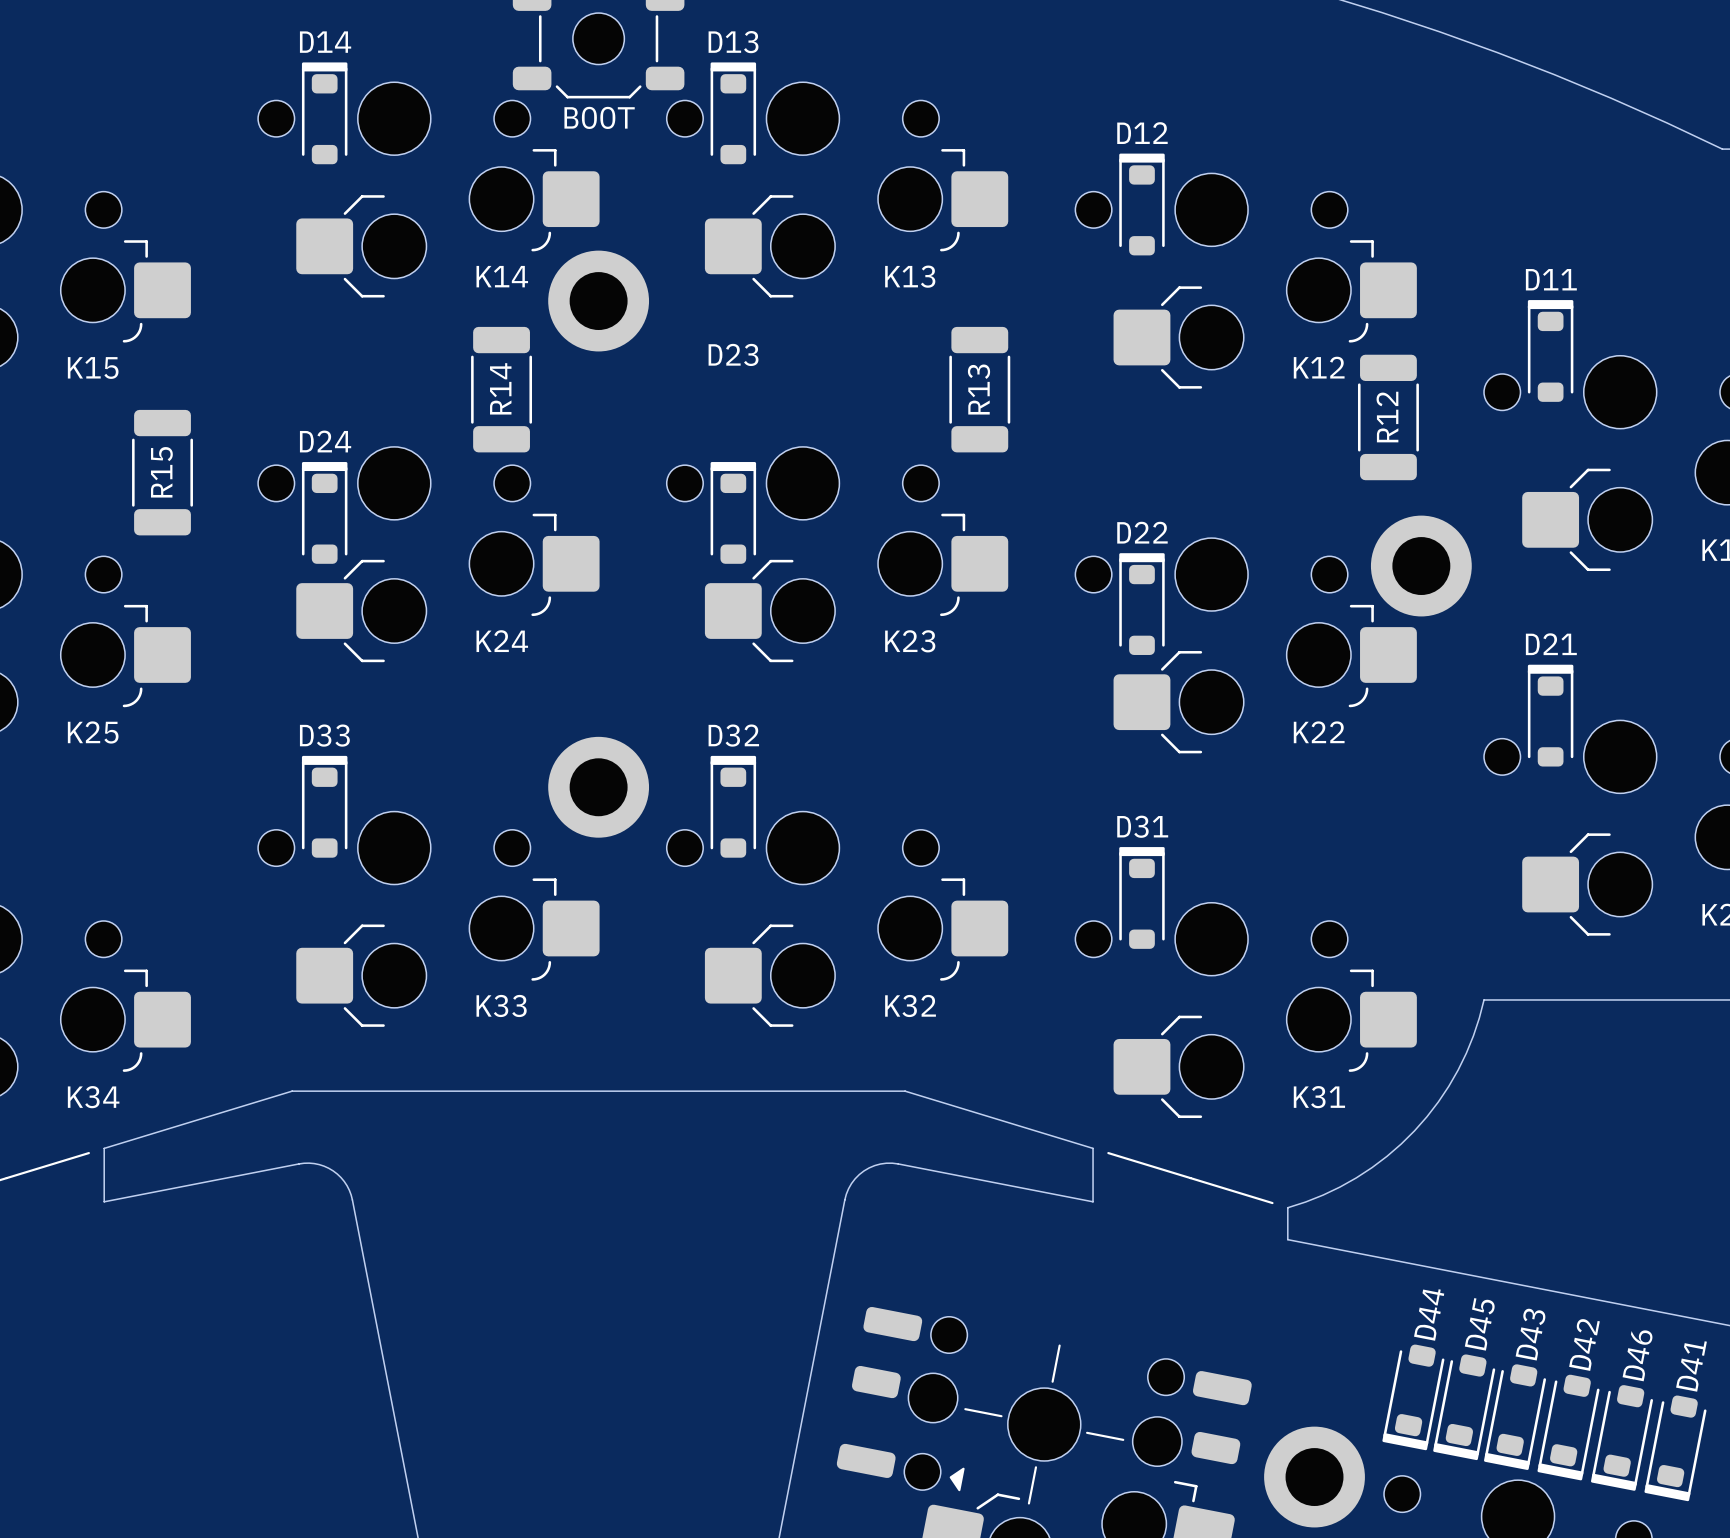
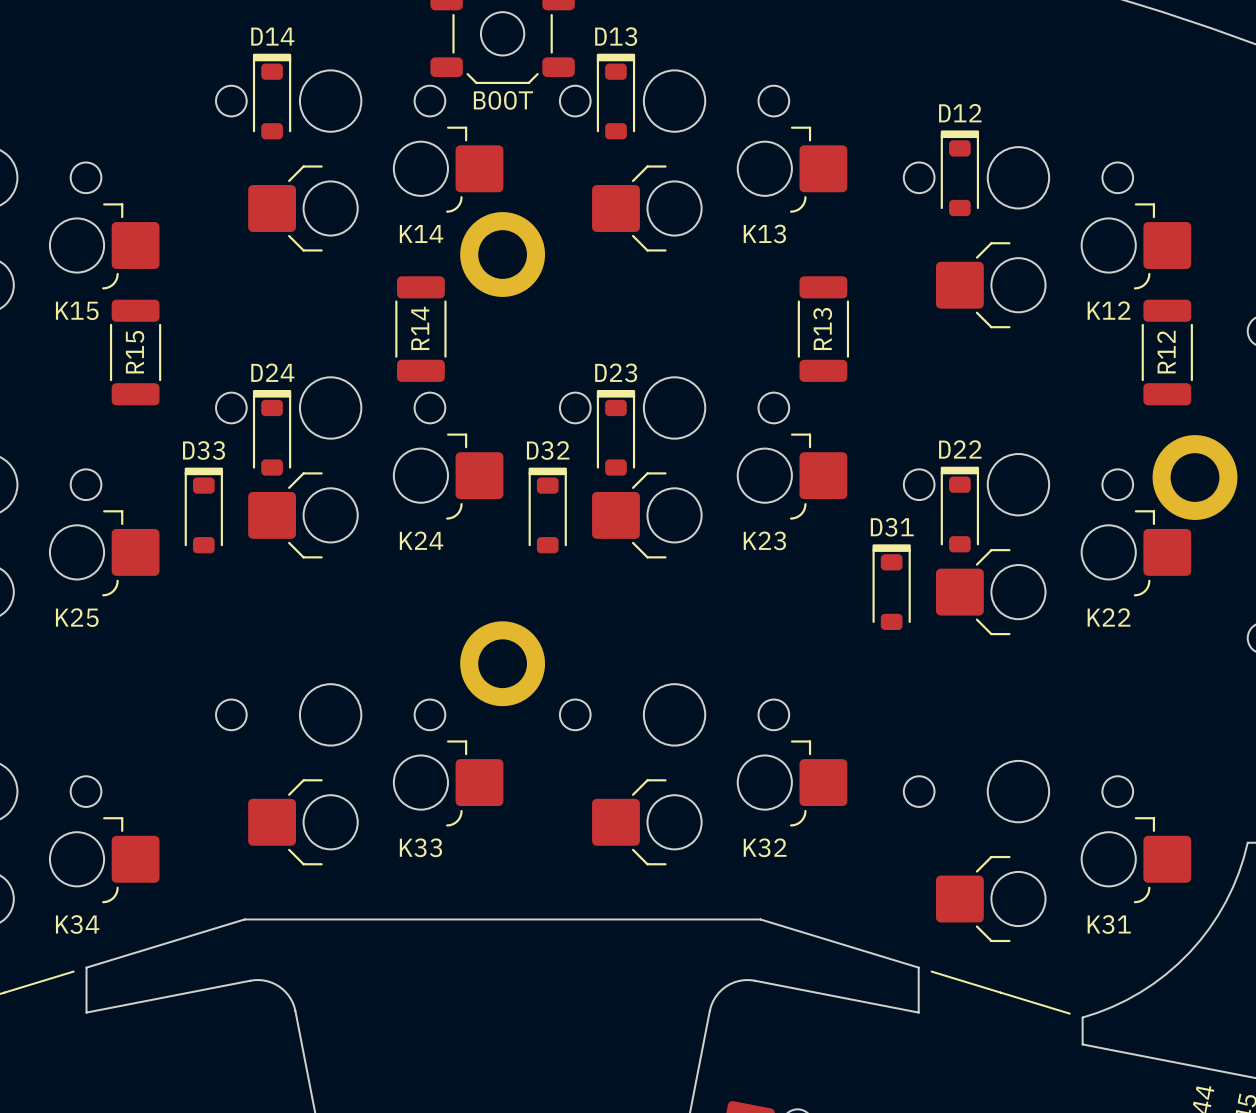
D23 name position: D23 (733, 354) -> D23 (616, 372)
R15 position: (162, 472) -> (135, 352)
D33 position: (324, 806) -> (203, 510)
D32 position: (733, 806) -> (547, 510)
D31 position: (1141, 897) -> (891, 587)

